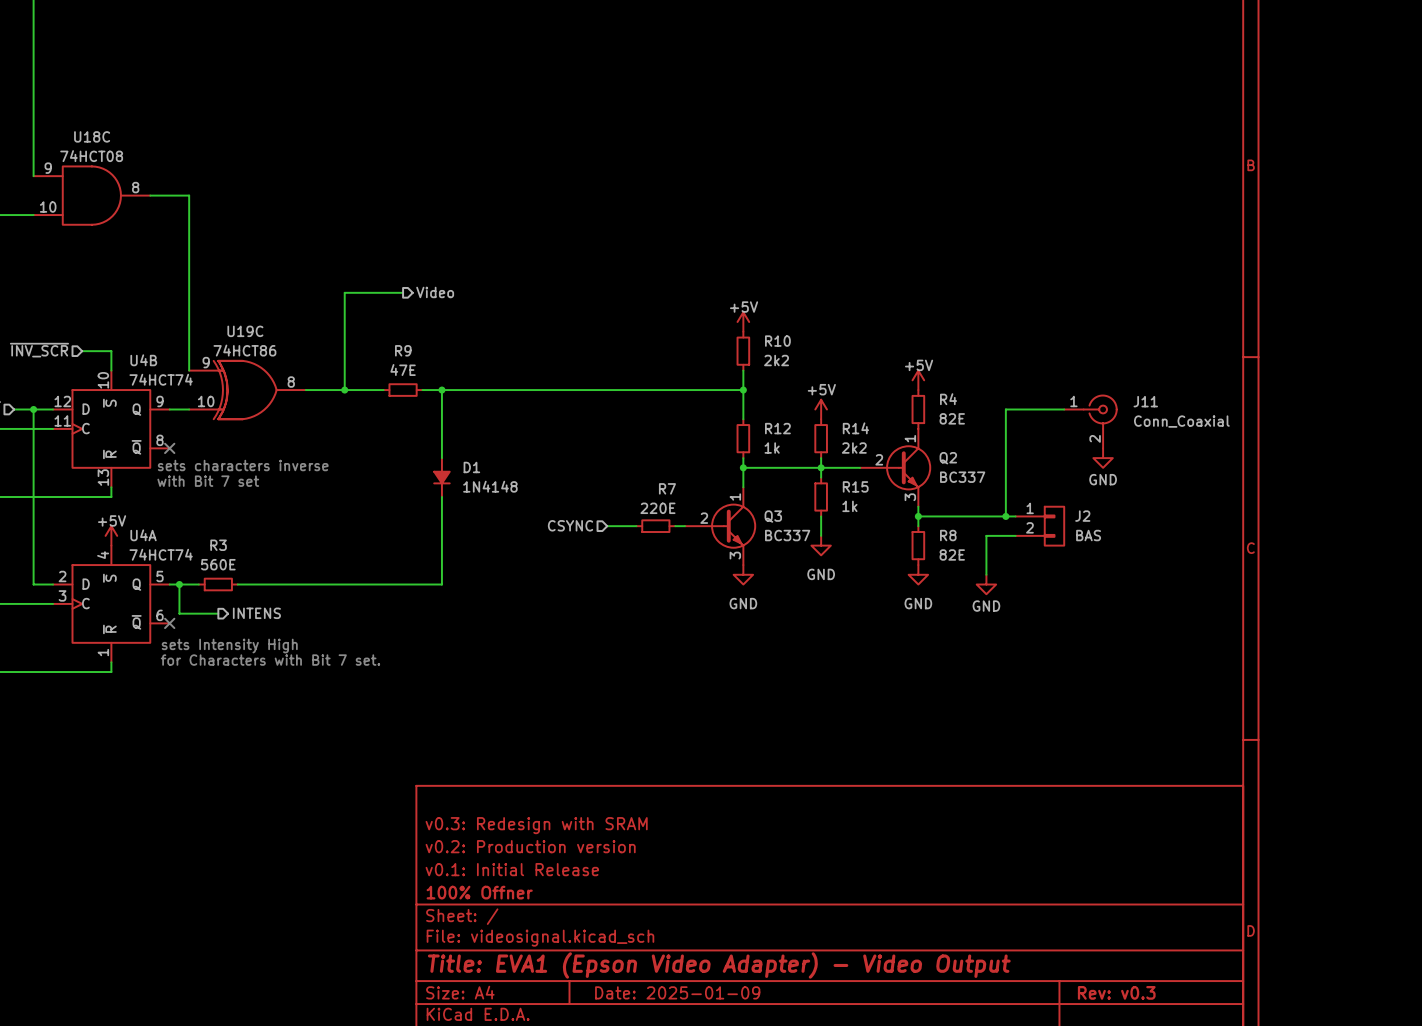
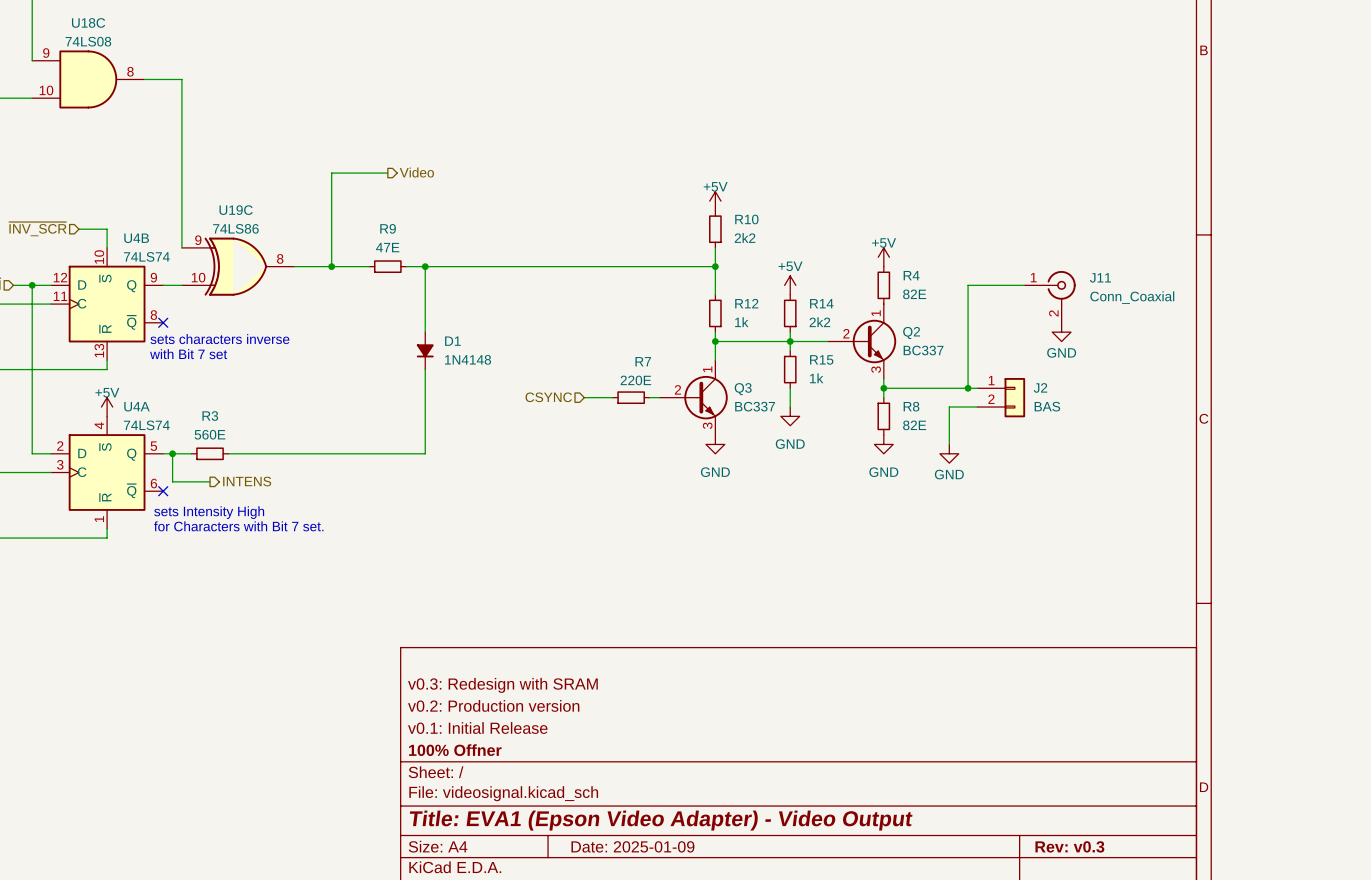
U18C value: 74HCT08 (91, 156) -> 74LS08 (88, 41)
U19C value: 74HCT86 (244, 350) -> 74LS86 (235, 228)
U4B value: 74HCT74 (161, 379) -> 74LS74 (146, 256)
U4A value: 74HCT74 (161, 554) -> 74LS74 (146, 425)

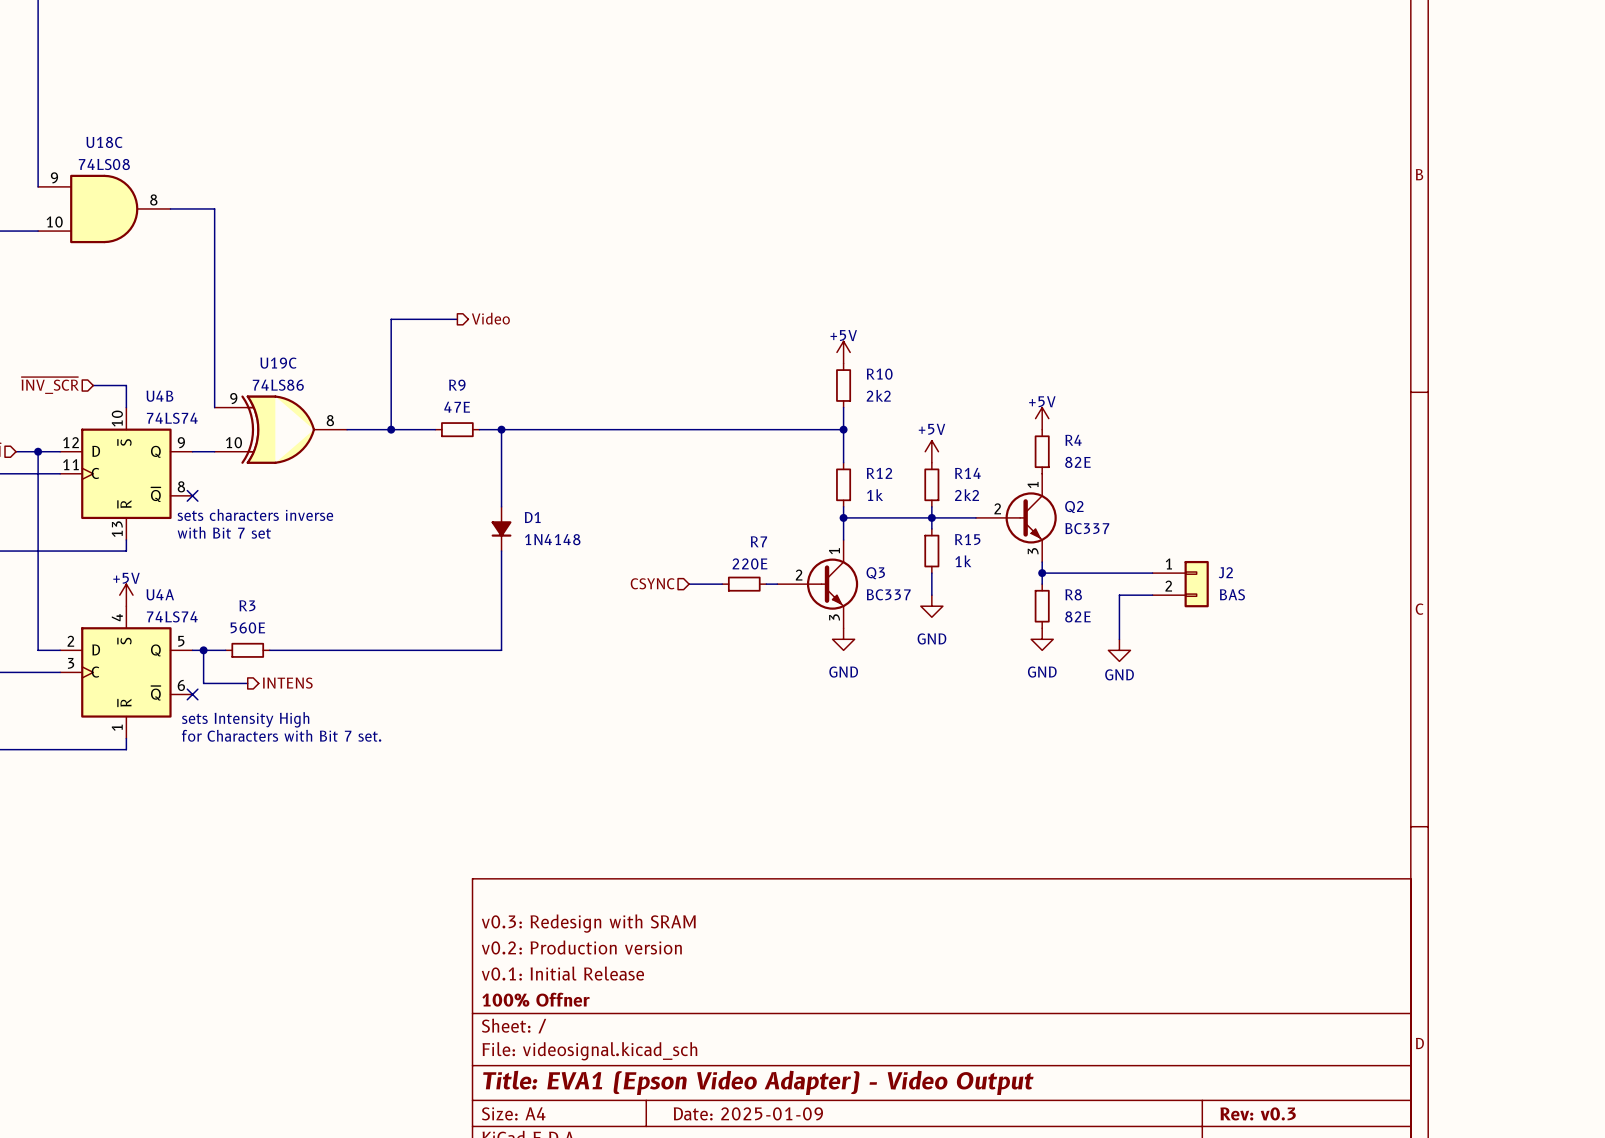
wire: (1024, 285) (968, 285) (968, 388) -> none
J11: Conn_Coaxial (1049, 296) -> none
power symbol: GND (1061, 332) -> none
junction: (968, 388) -> none

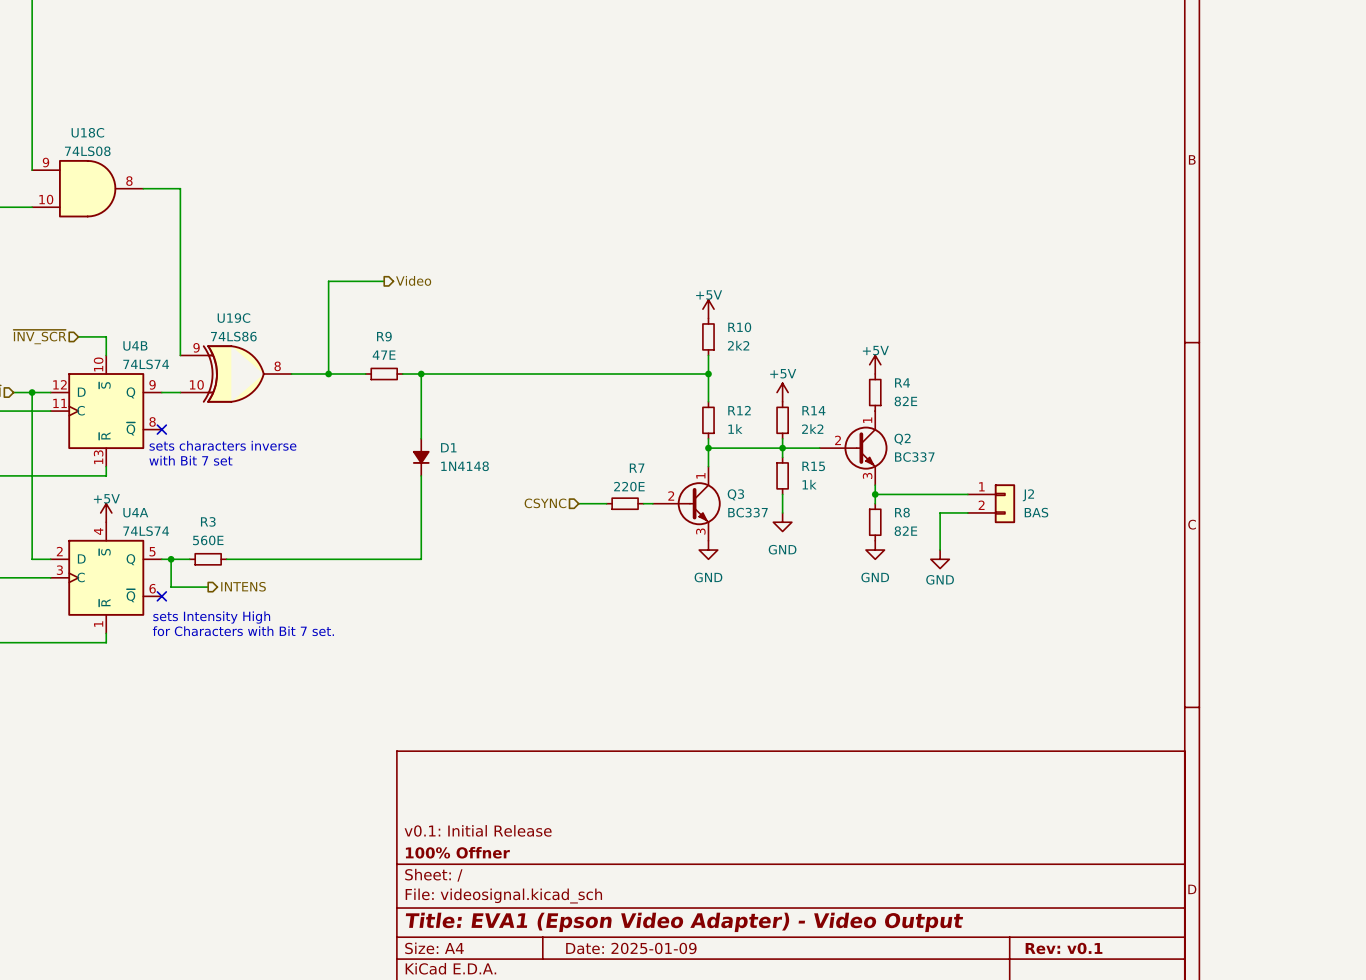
title block: v0.3: Redesign with SRAM (588, 923) -> none
title block: v0.2: Production version (581, 947) -> none
title block: Rev: v0.3 (1258, 1113) -> Rev: v0.1 (1064, 948)

